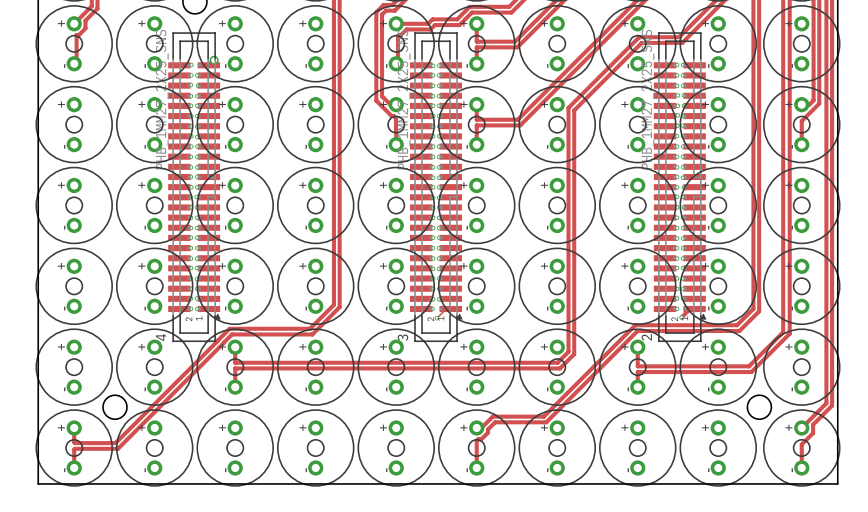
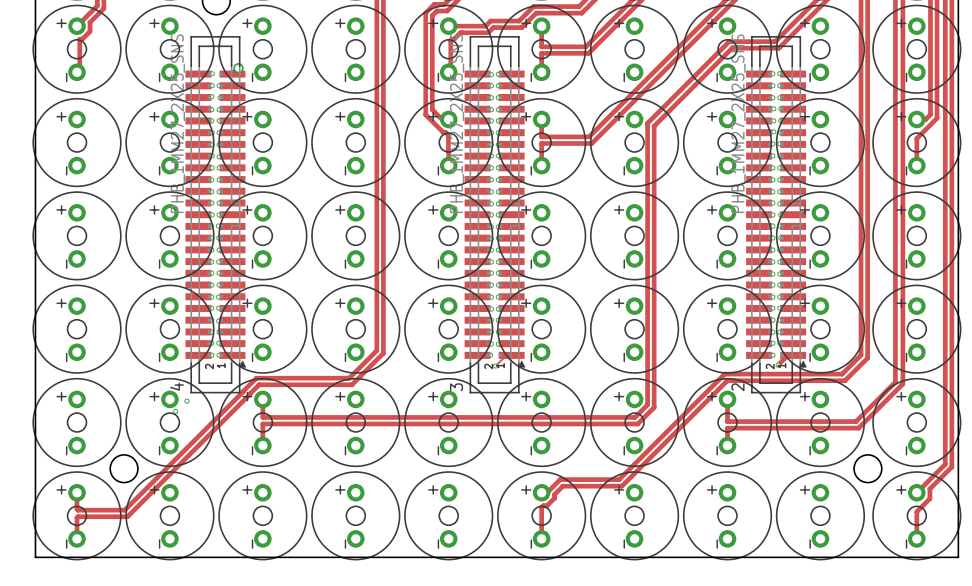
via: none -> (186, 401)
via: none -> (175, 411)

